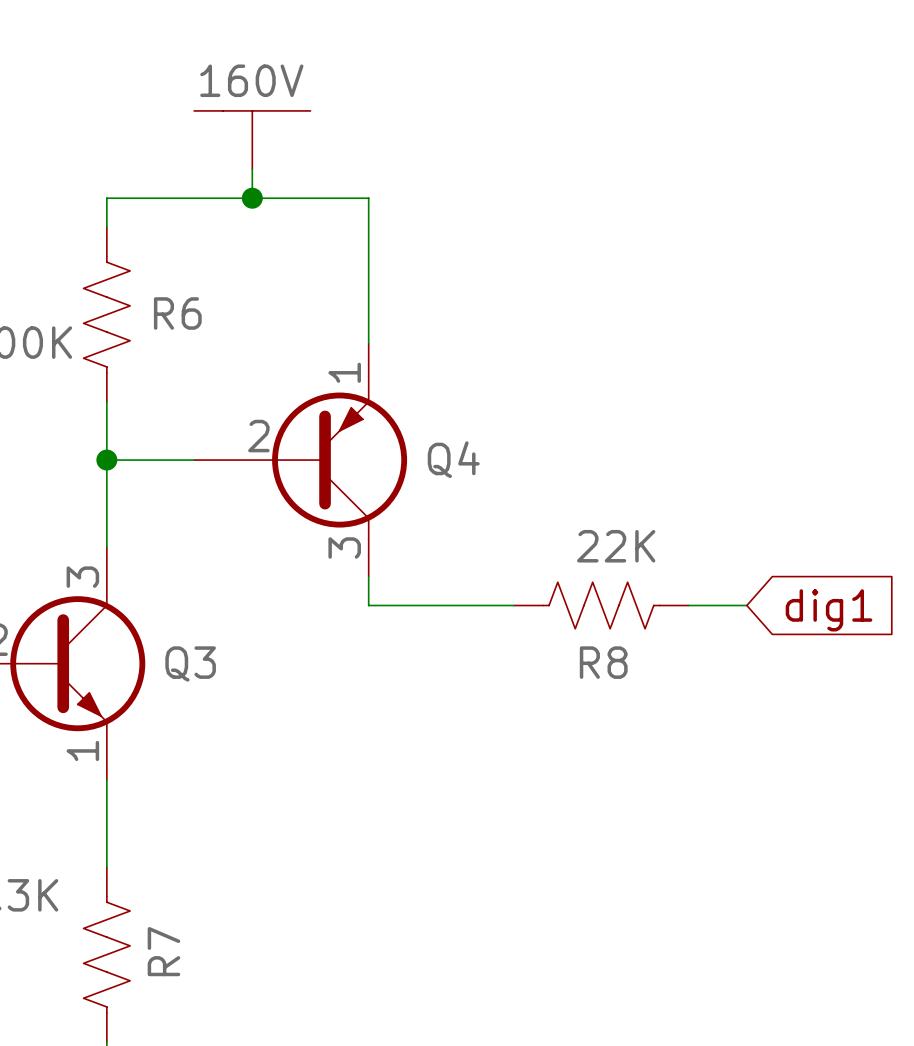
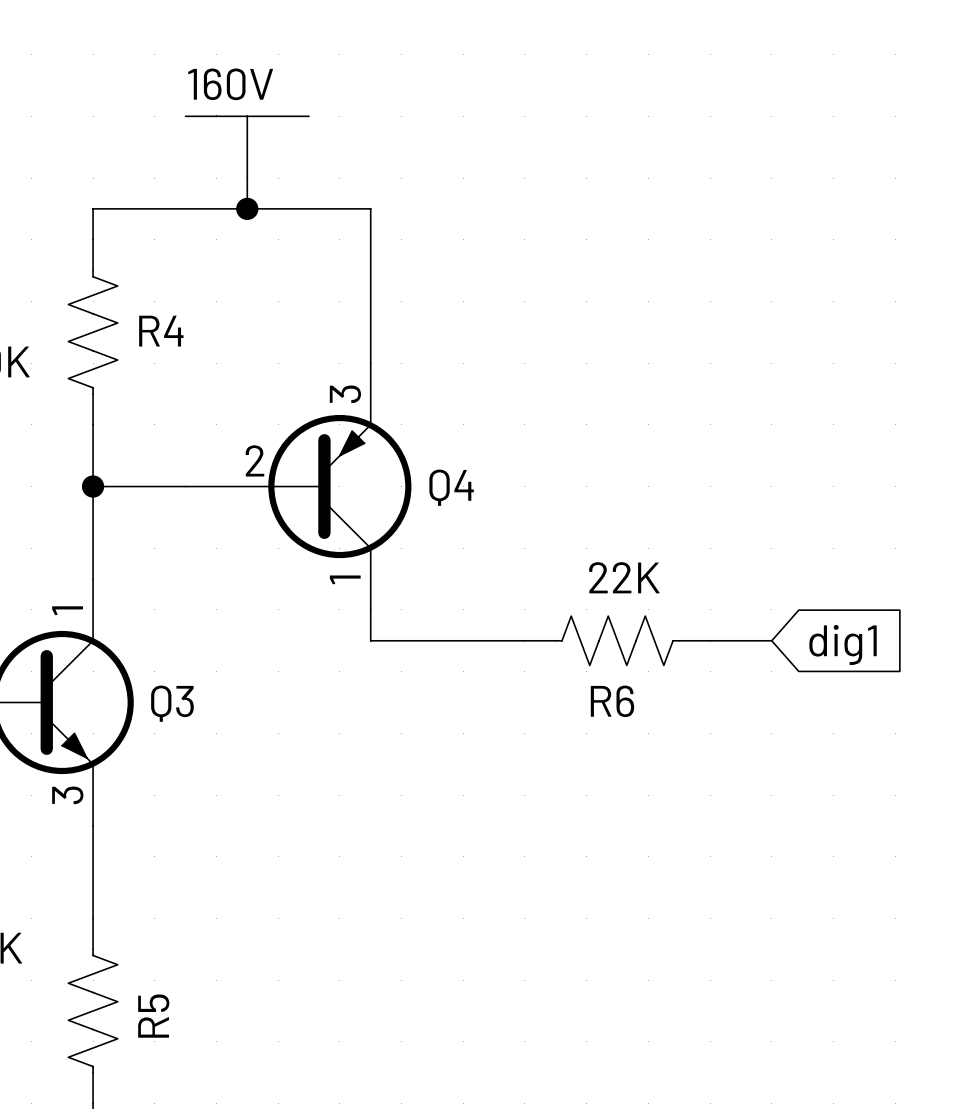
R6 name: R6 (177, 313) -> R4 (161, 331)
Q4 pin number: 1 (344, 372) -> 3 (345, 394)
Q4 pin number: 3 (344, 548) -> 1 (345, 579)
Q3 pin number: 3 (82, 577) -> 1 (67, 610)
R8 name: R8 (603, 662) -> R6 (612, 701)
Q3 pin number: 1 (82, 750) -> 3 (67, 795)
R7 name: R7 (163, 951) -> R5 (153, 1016)

